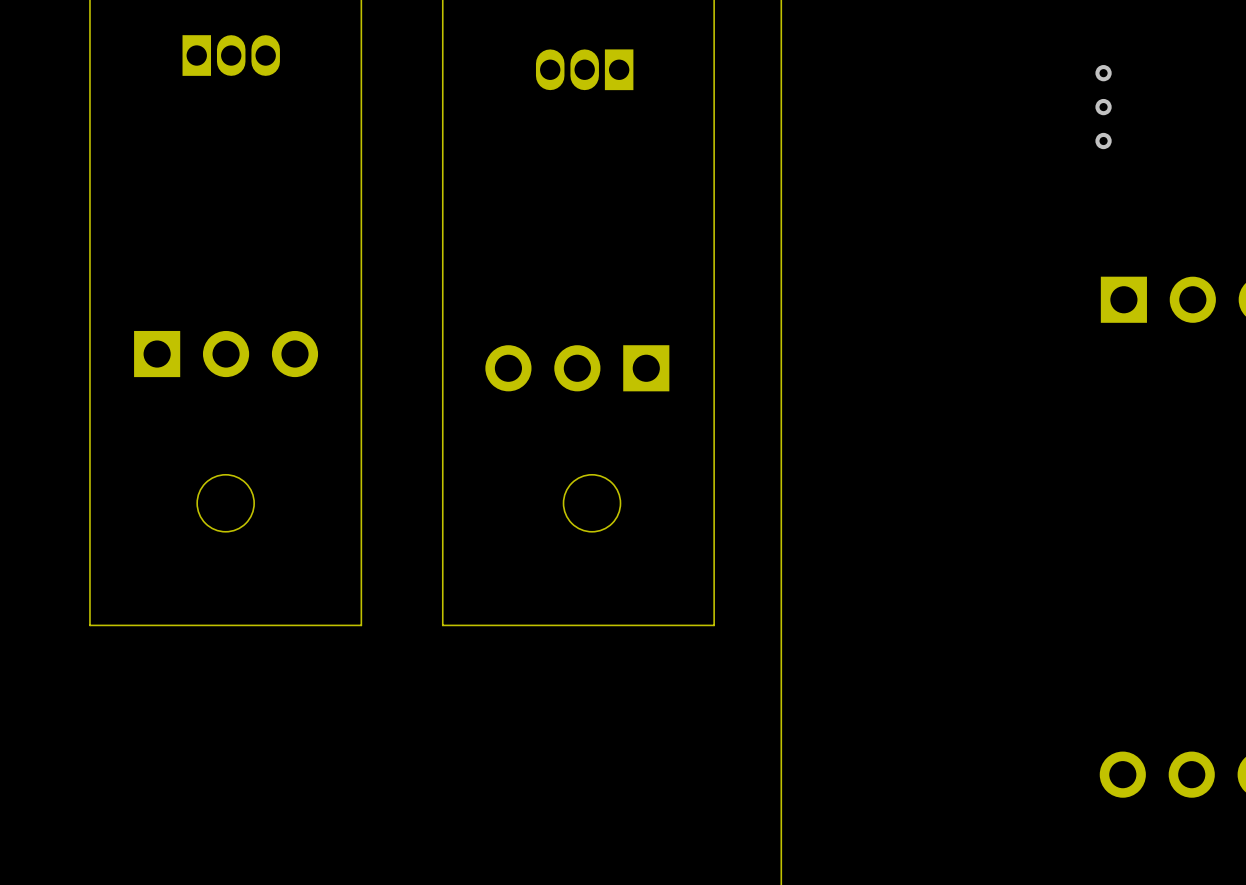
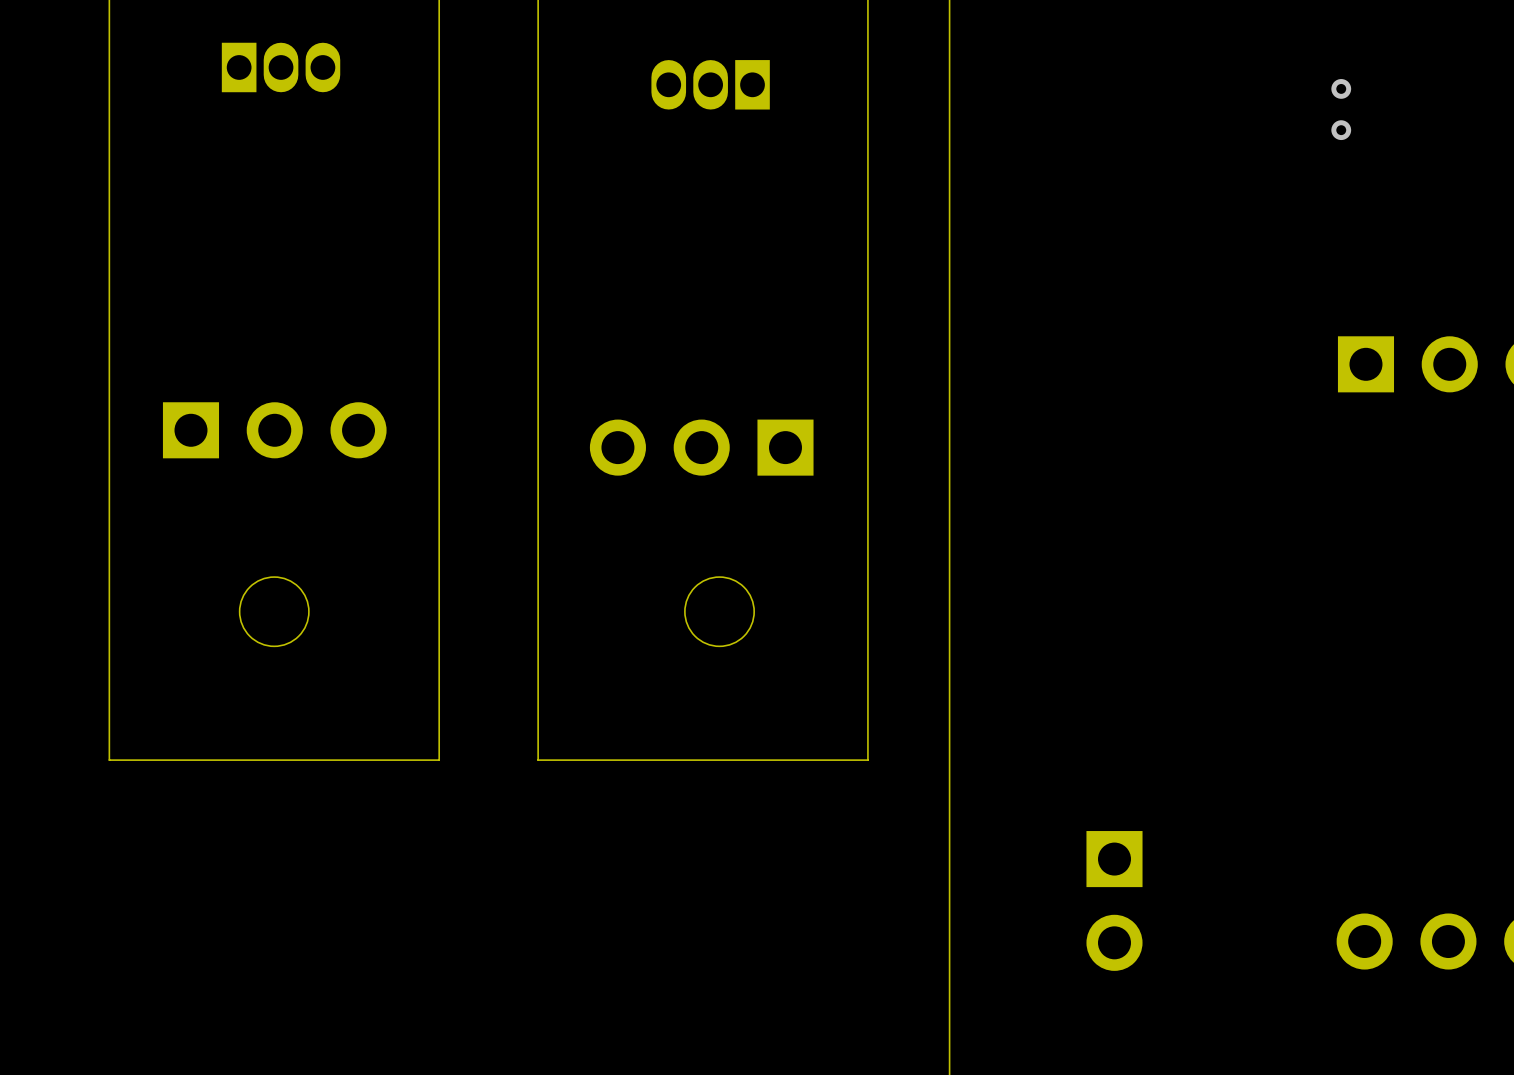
via: (1103, 141) -> none
part: none -> (1114, 900)

